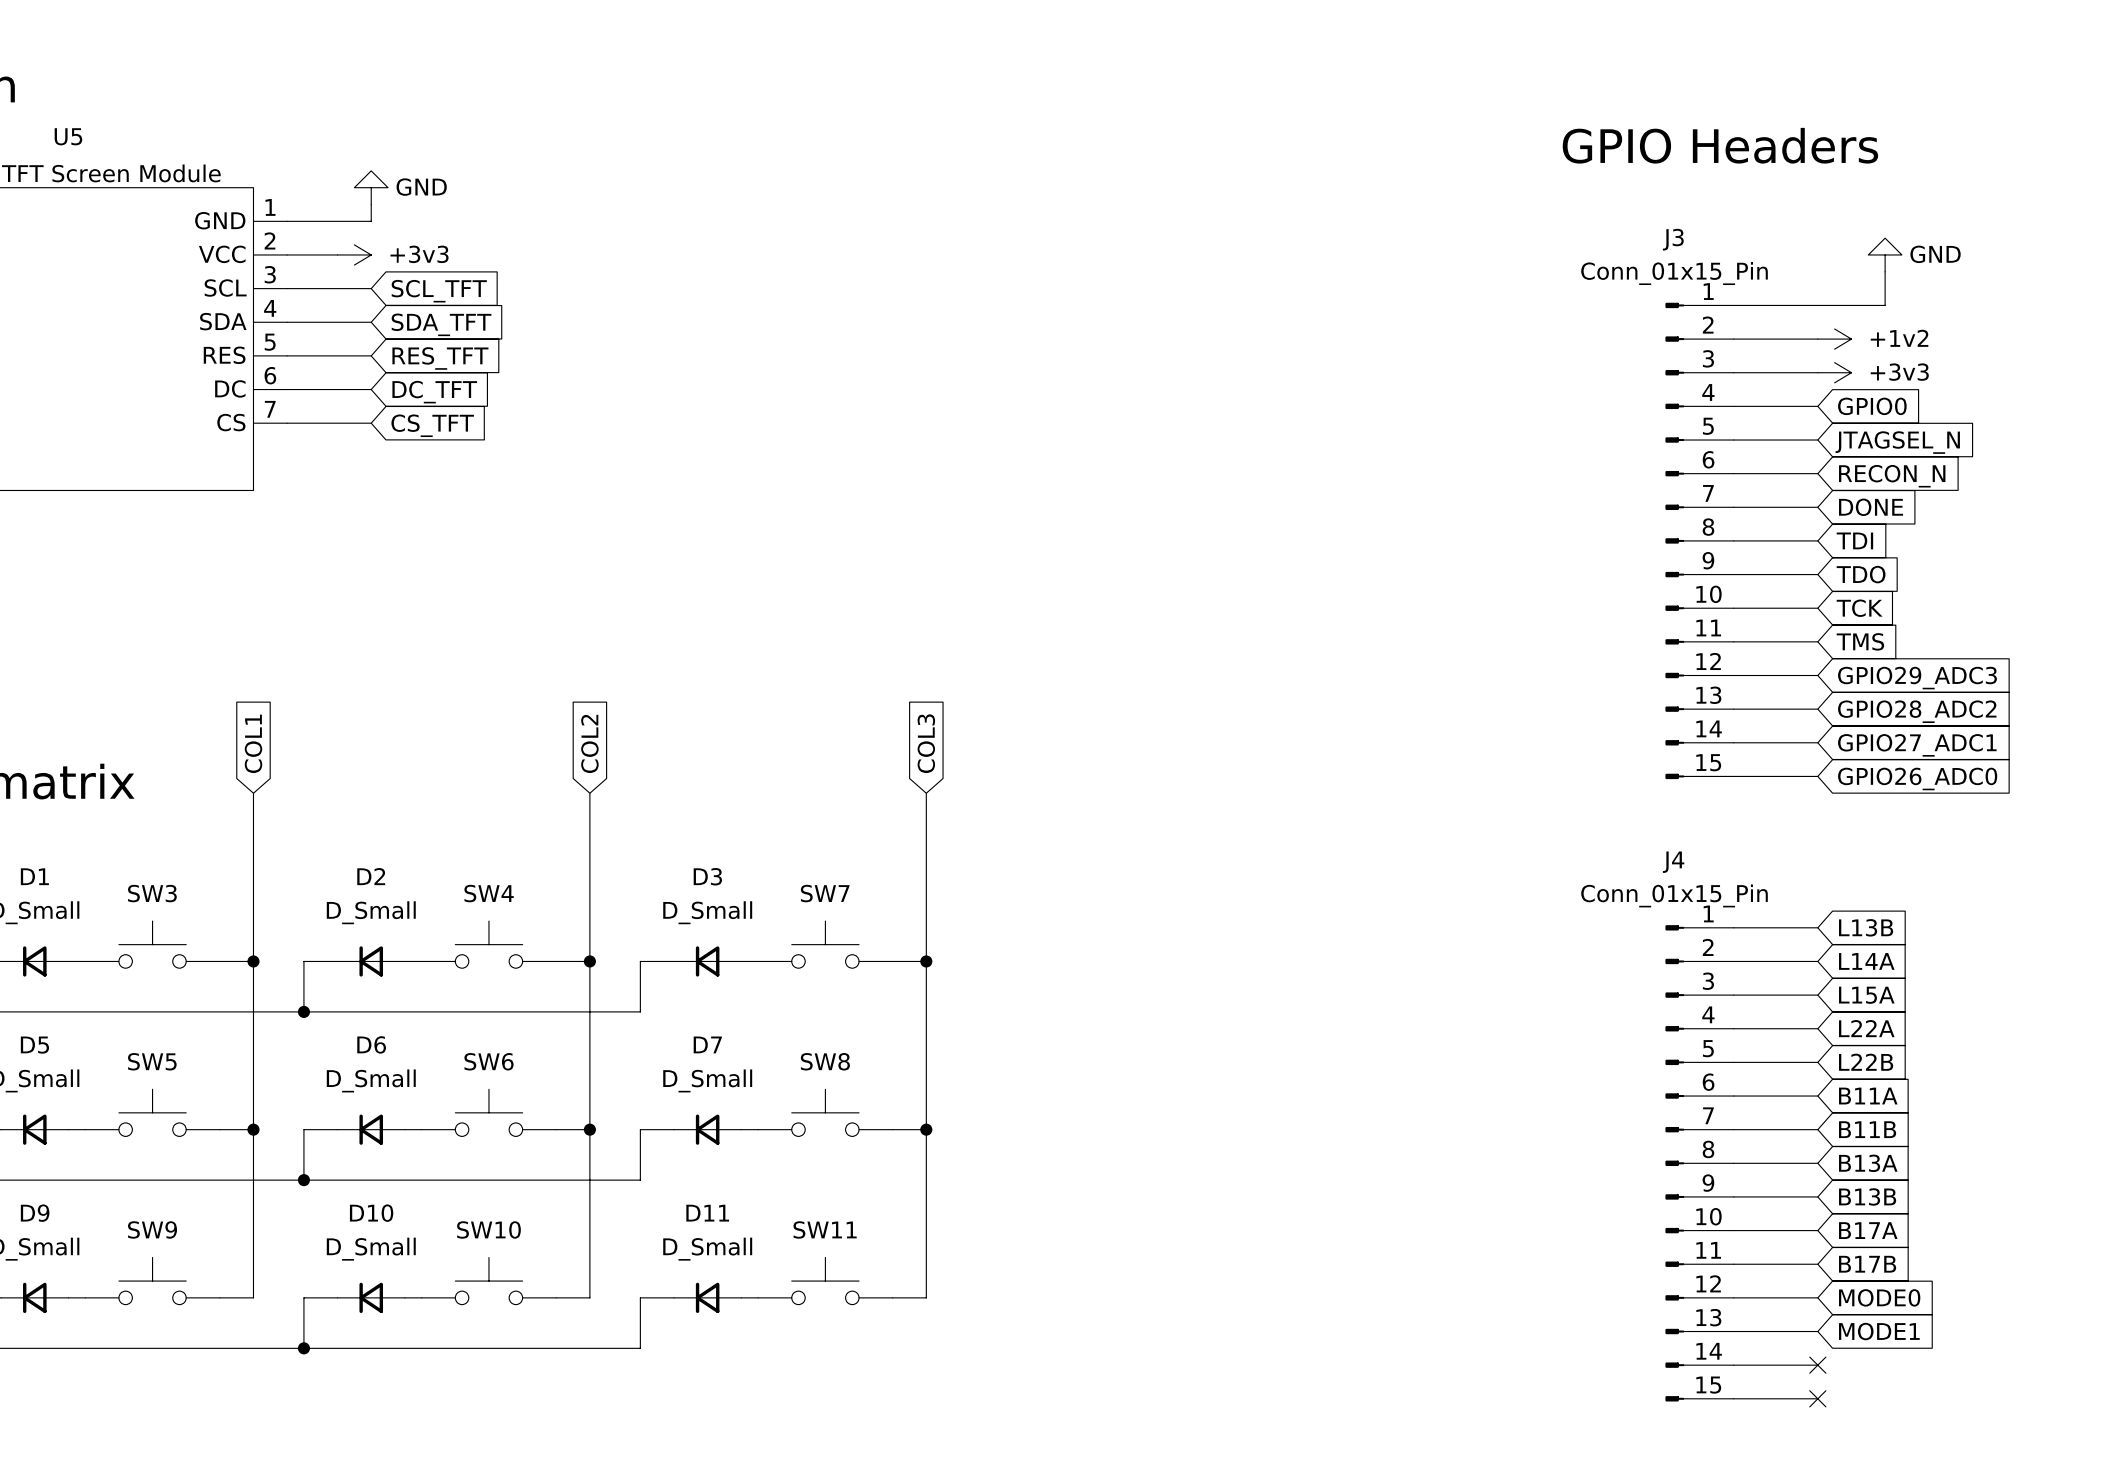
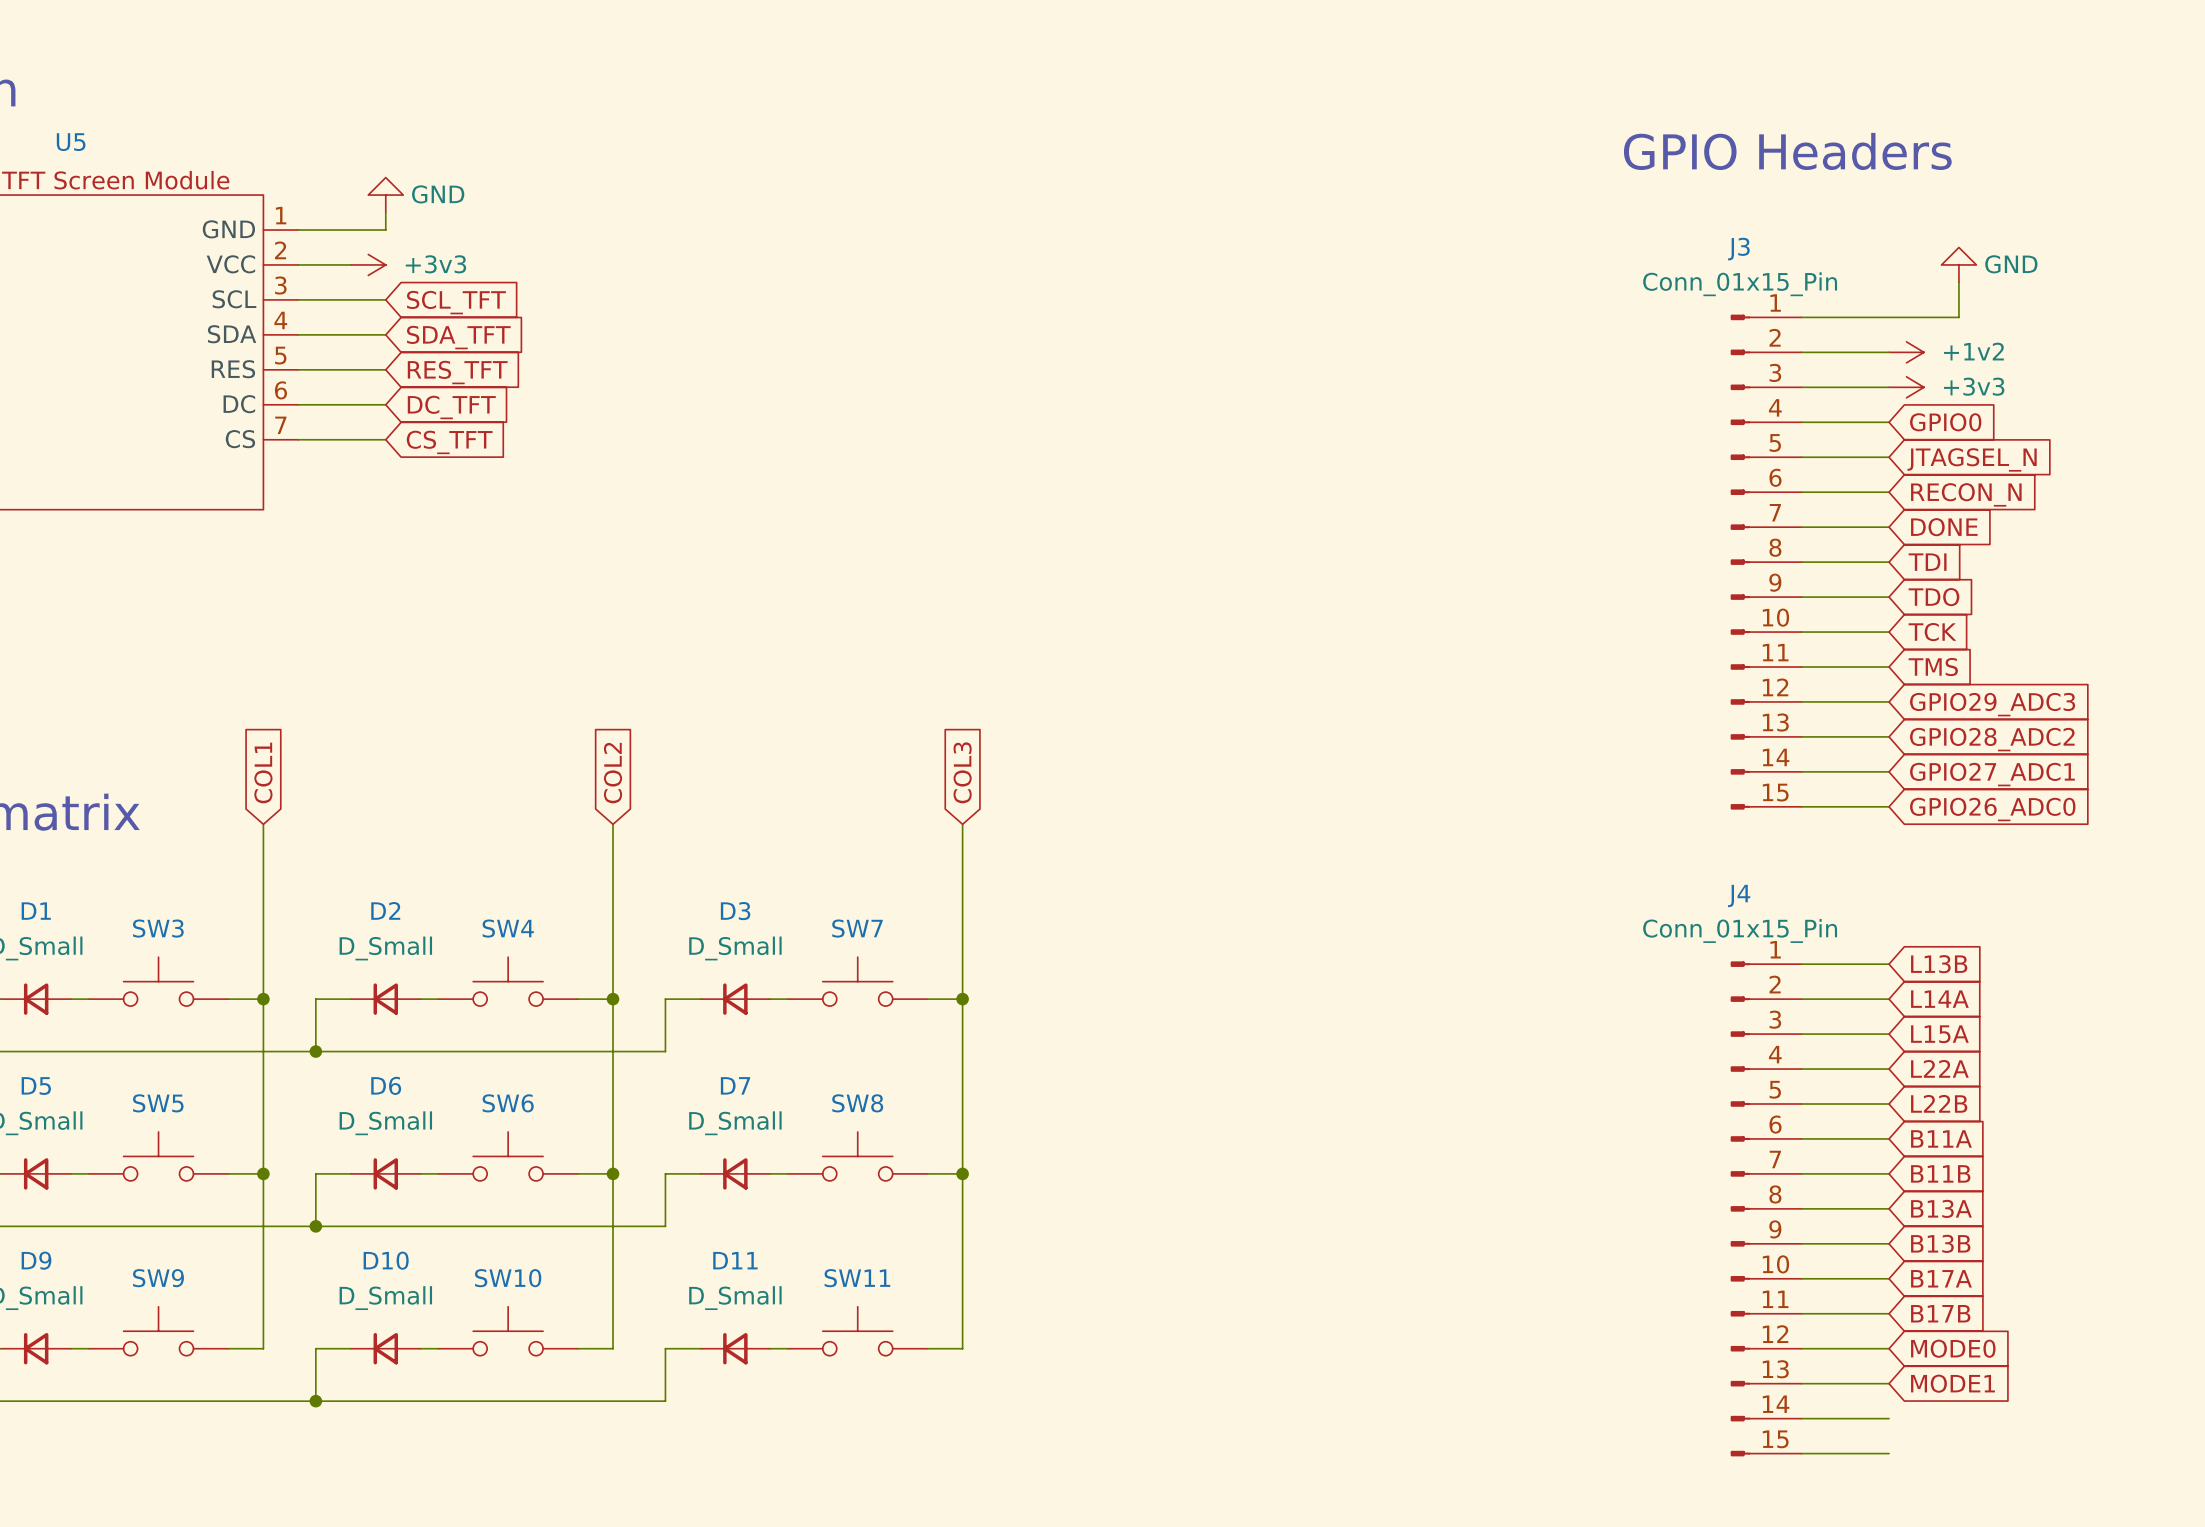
no-connect mark: (1817, 1365) -> none
no-connect mark: (1817, 1398) -> none

